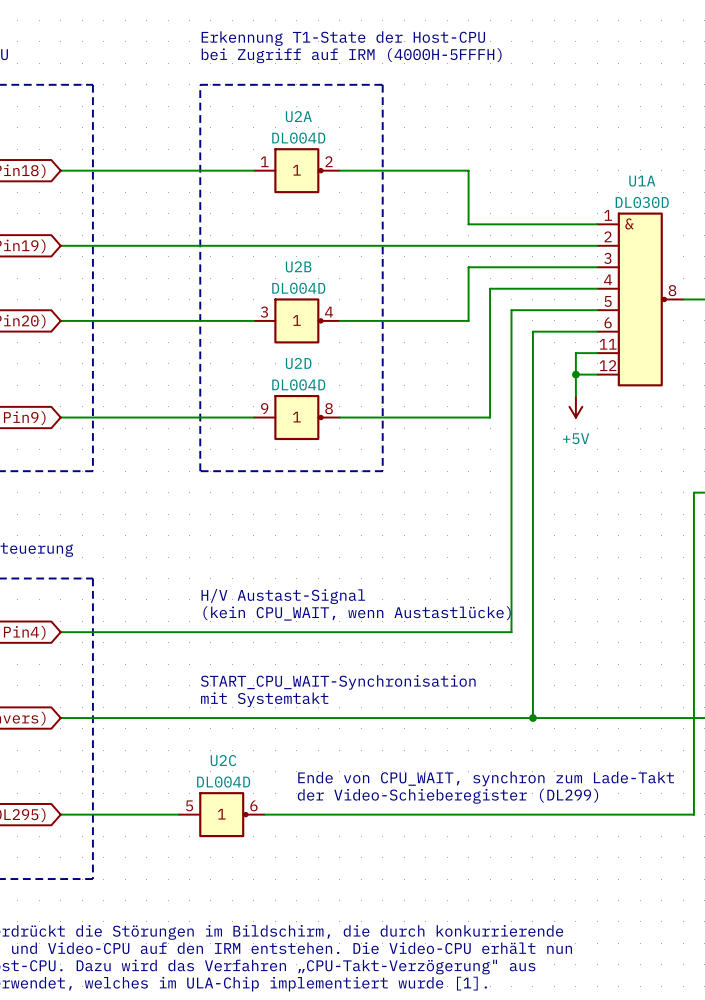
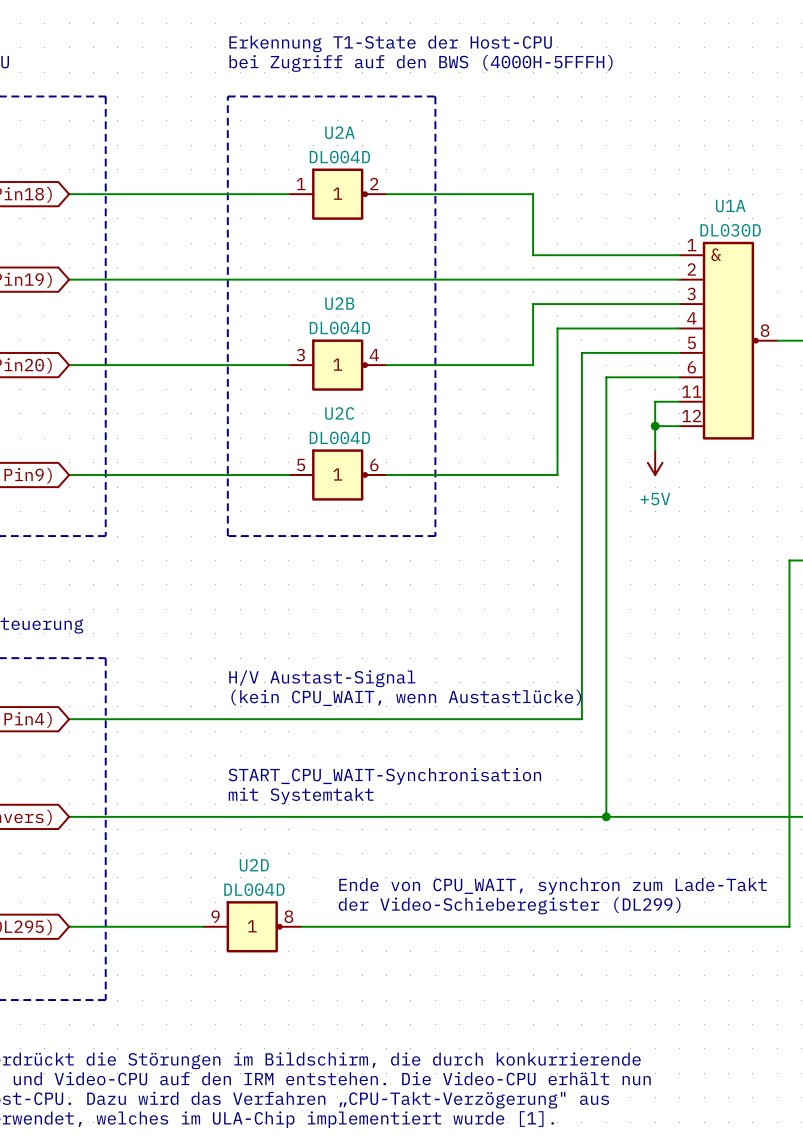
text: bei Zugriff auf IRM (4000H-5FFFH) (351, 55) -> bei Zugriff auf den BWS (4000H-5FFFH) (421, 63)
U2D position: (296, 417) -> (252, 926)
U2C position: (221, 814) -> (337, 475)

